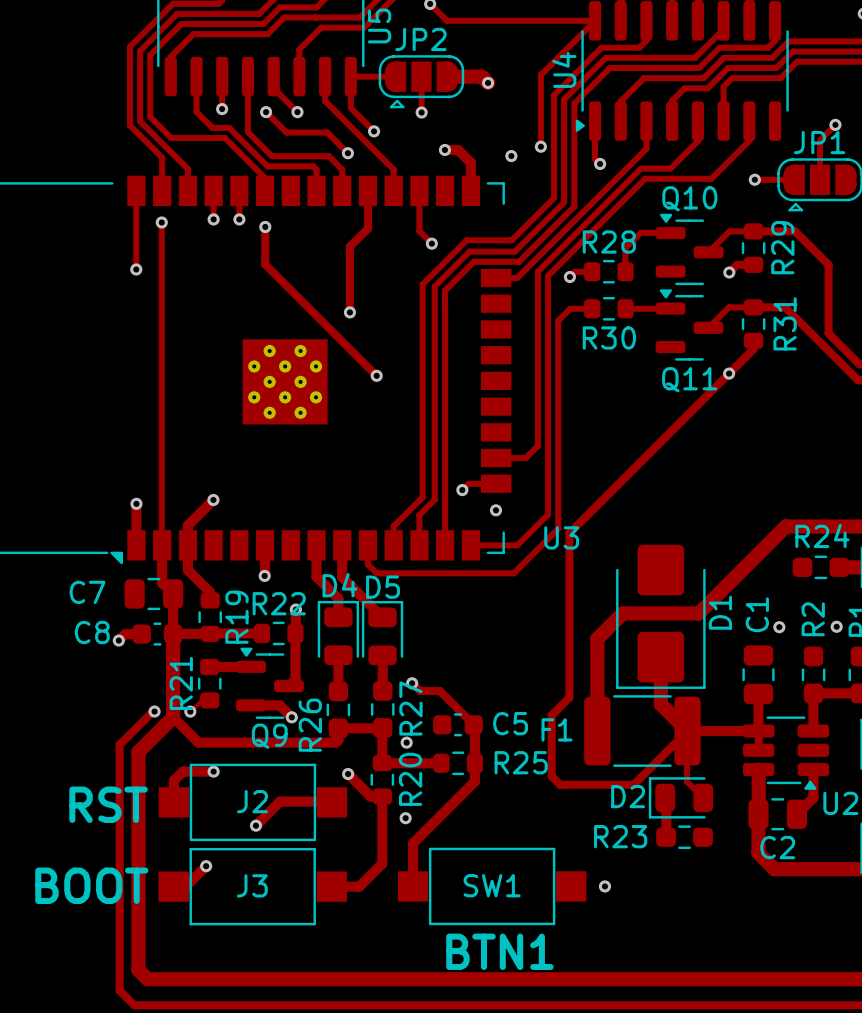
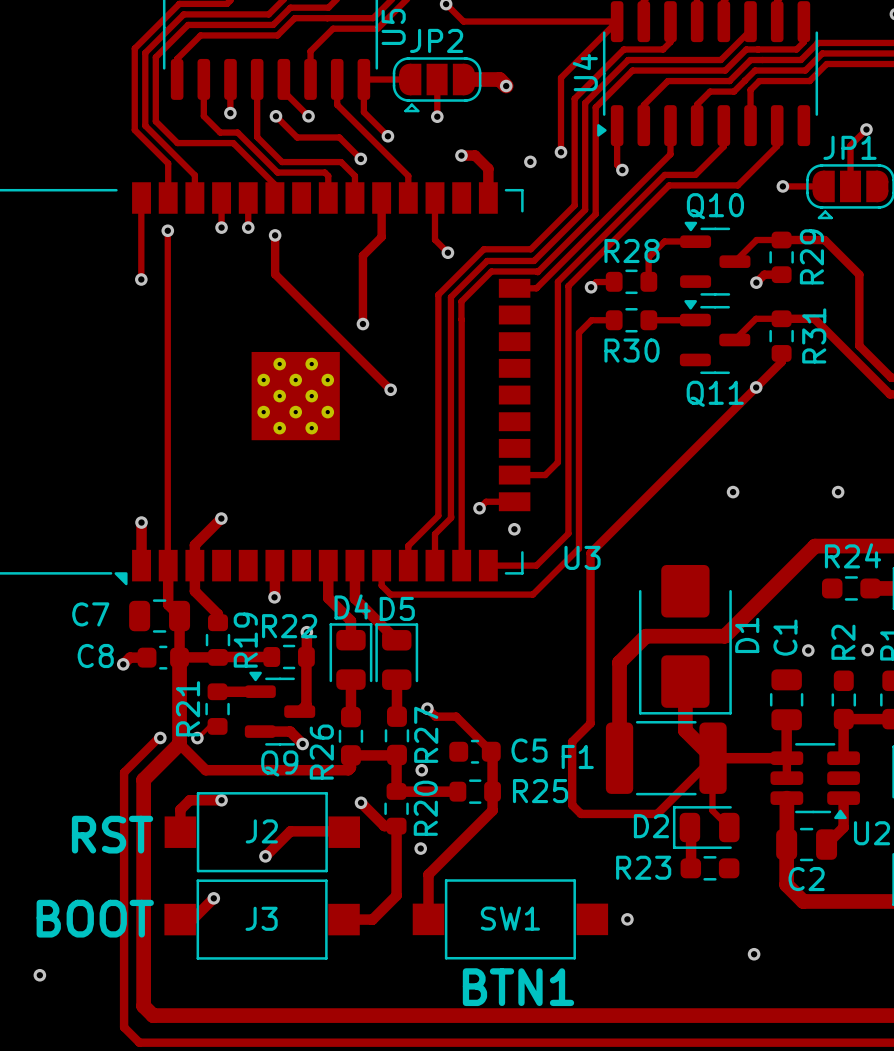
via: none -> (733, 492)
via: none -> (838, 492)
via: none -> (754, 954)
via: none -> (39, 975)

